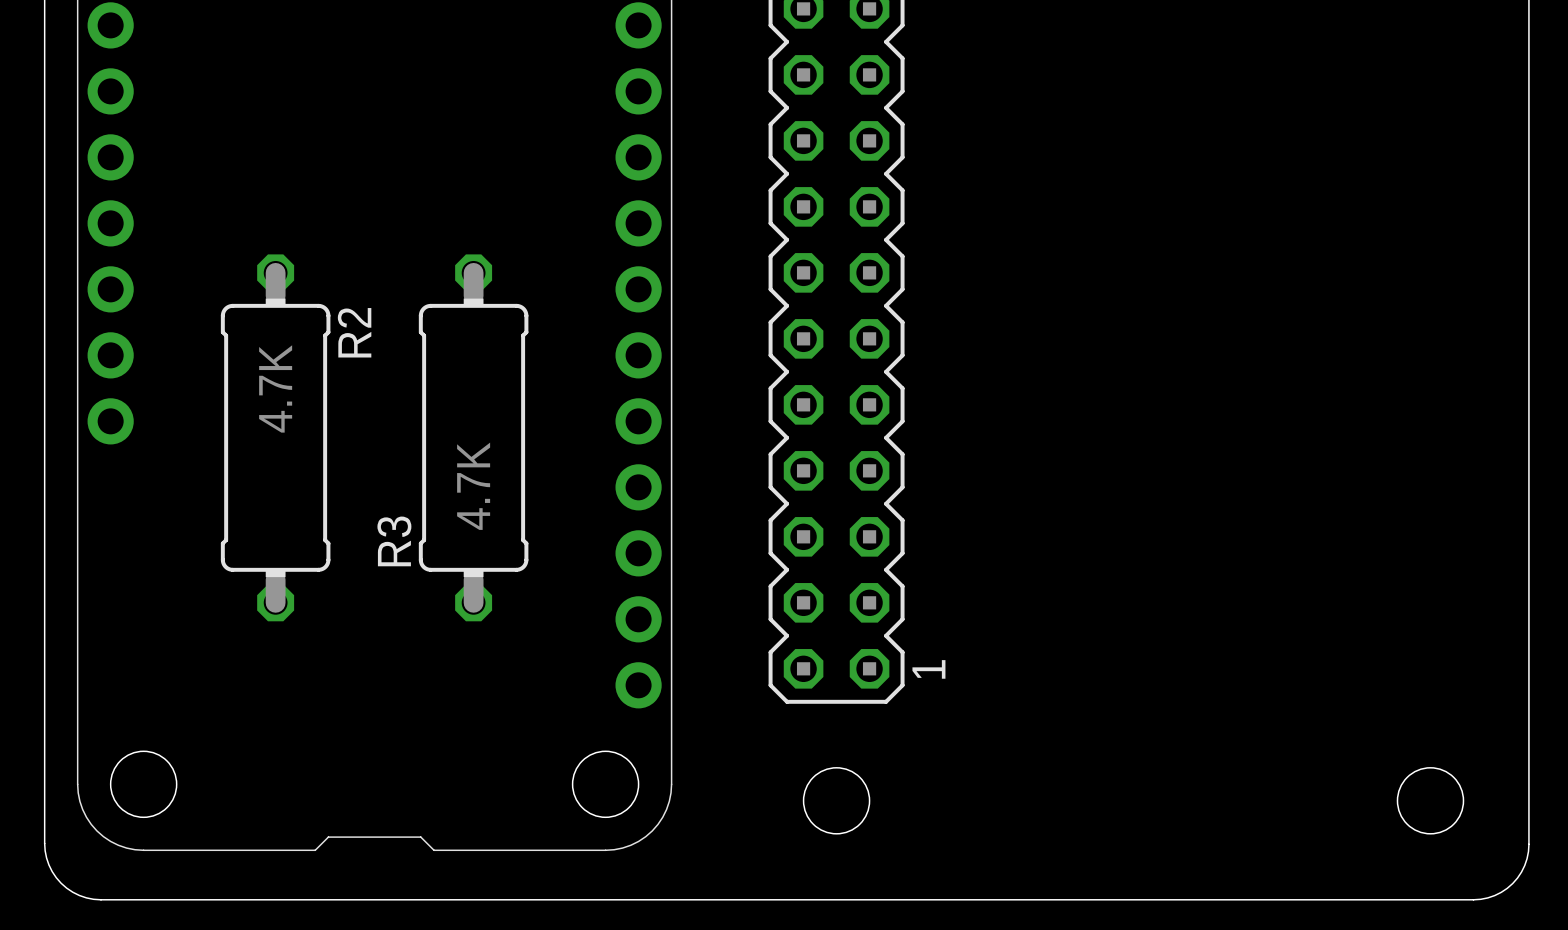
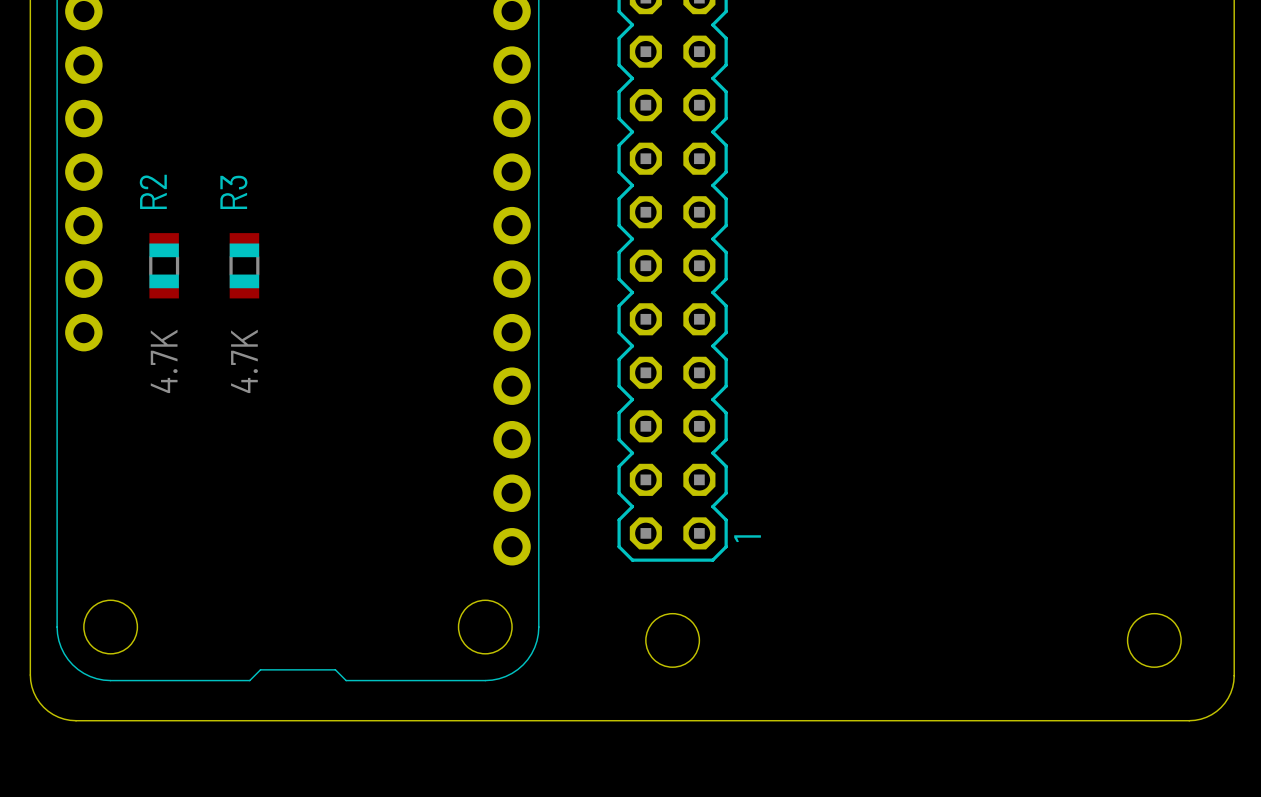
R2 footprint: [220, 254, 331, 622] -> [149, 233, 180, 299]
R3 footprint: [418, 254, 529, 622] -> [229, 233, 260, 299]
R2 name position: R2 (354, 332) -> R2 (153, 191)
R2 value position: 4.7K (275, 388) -> 4.7K (164, 361)
R3 value position: 4.7K (473, 486) -> 4.7K (244, 361)
R3 name position: R3 (394, 541) -> R3 (233, 192)

